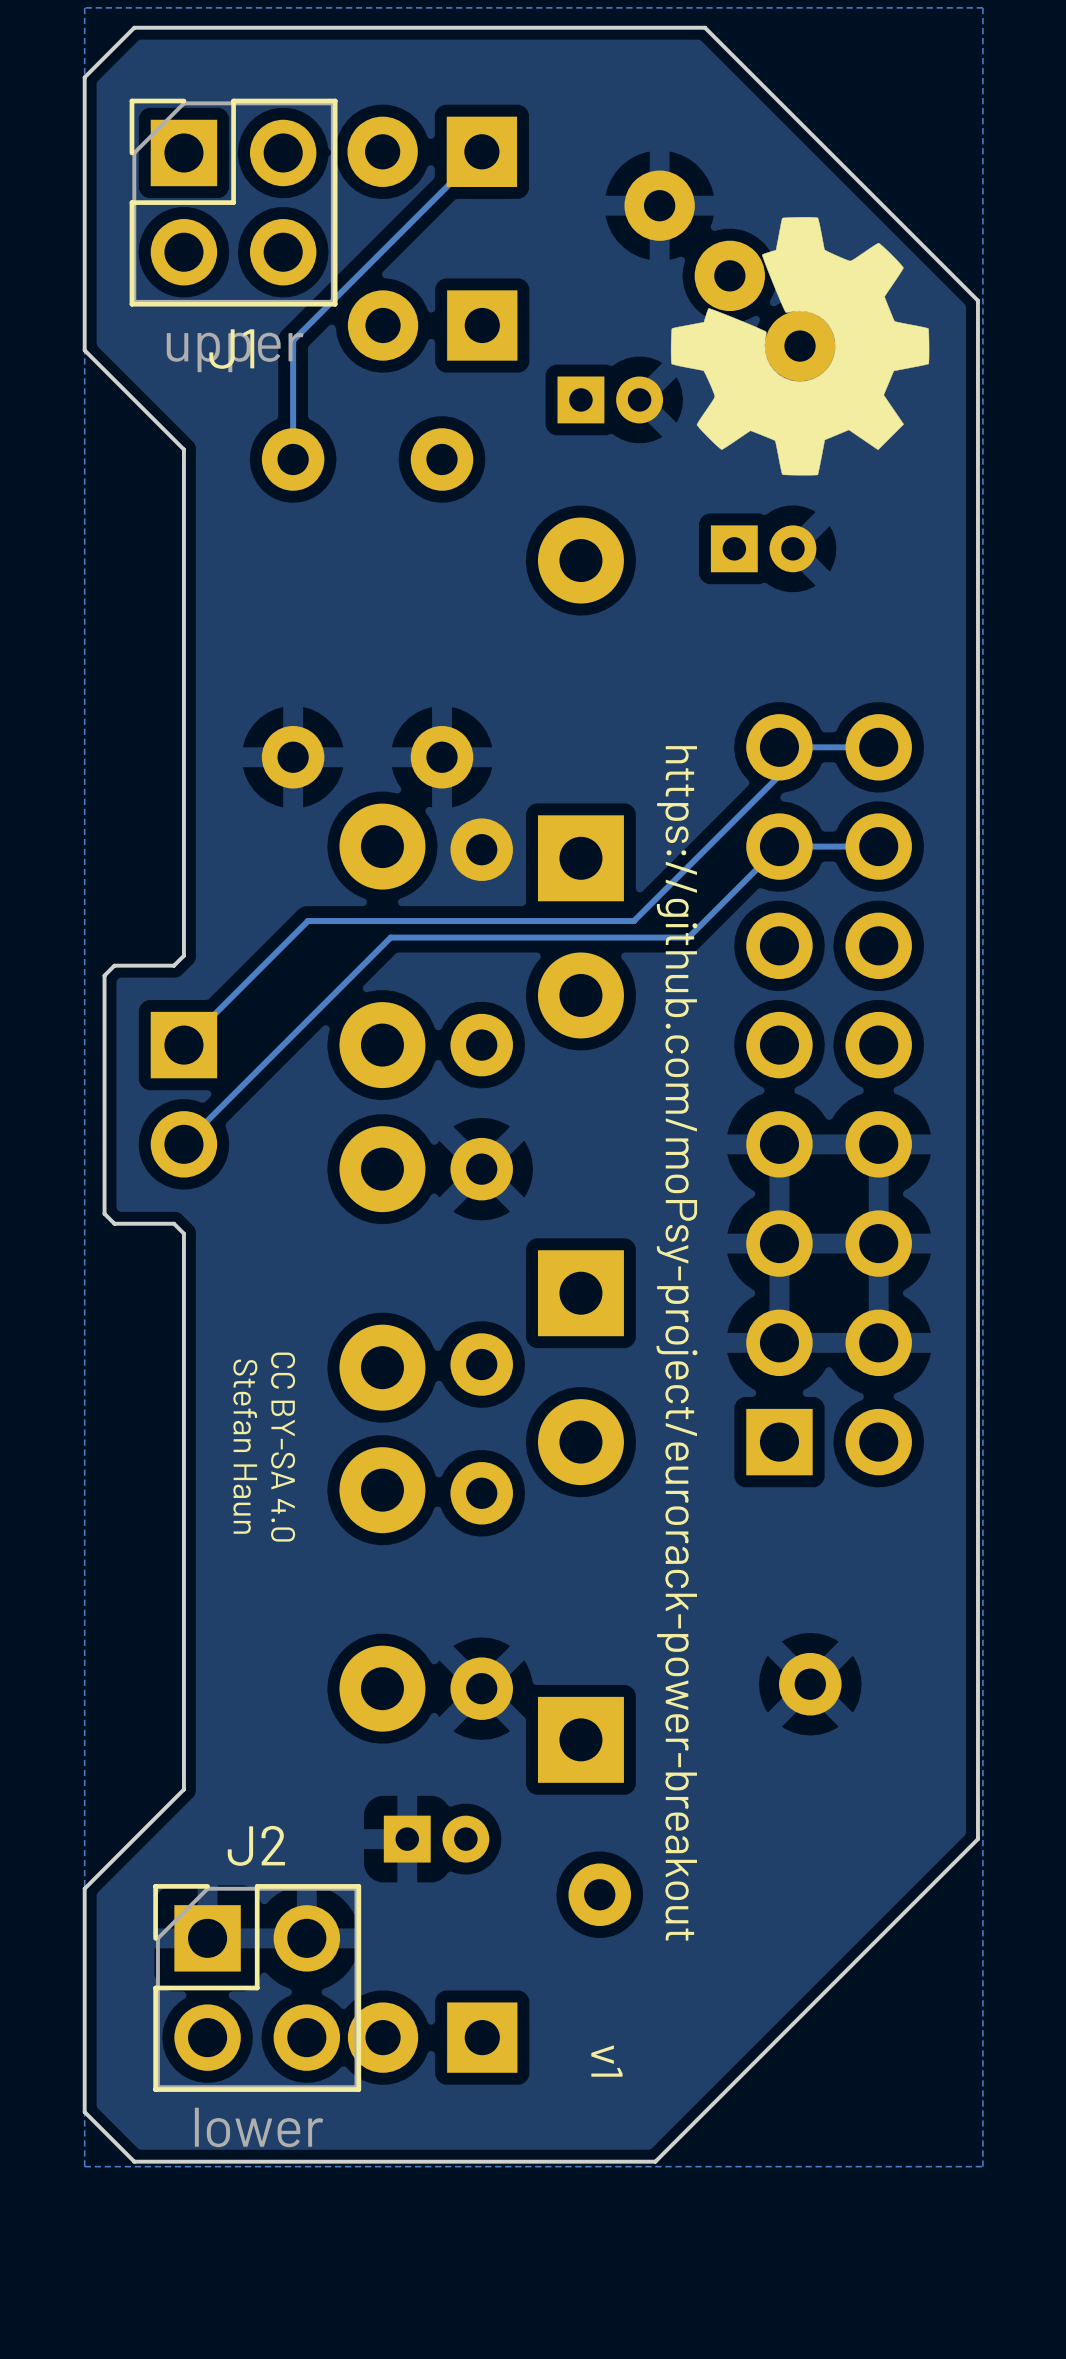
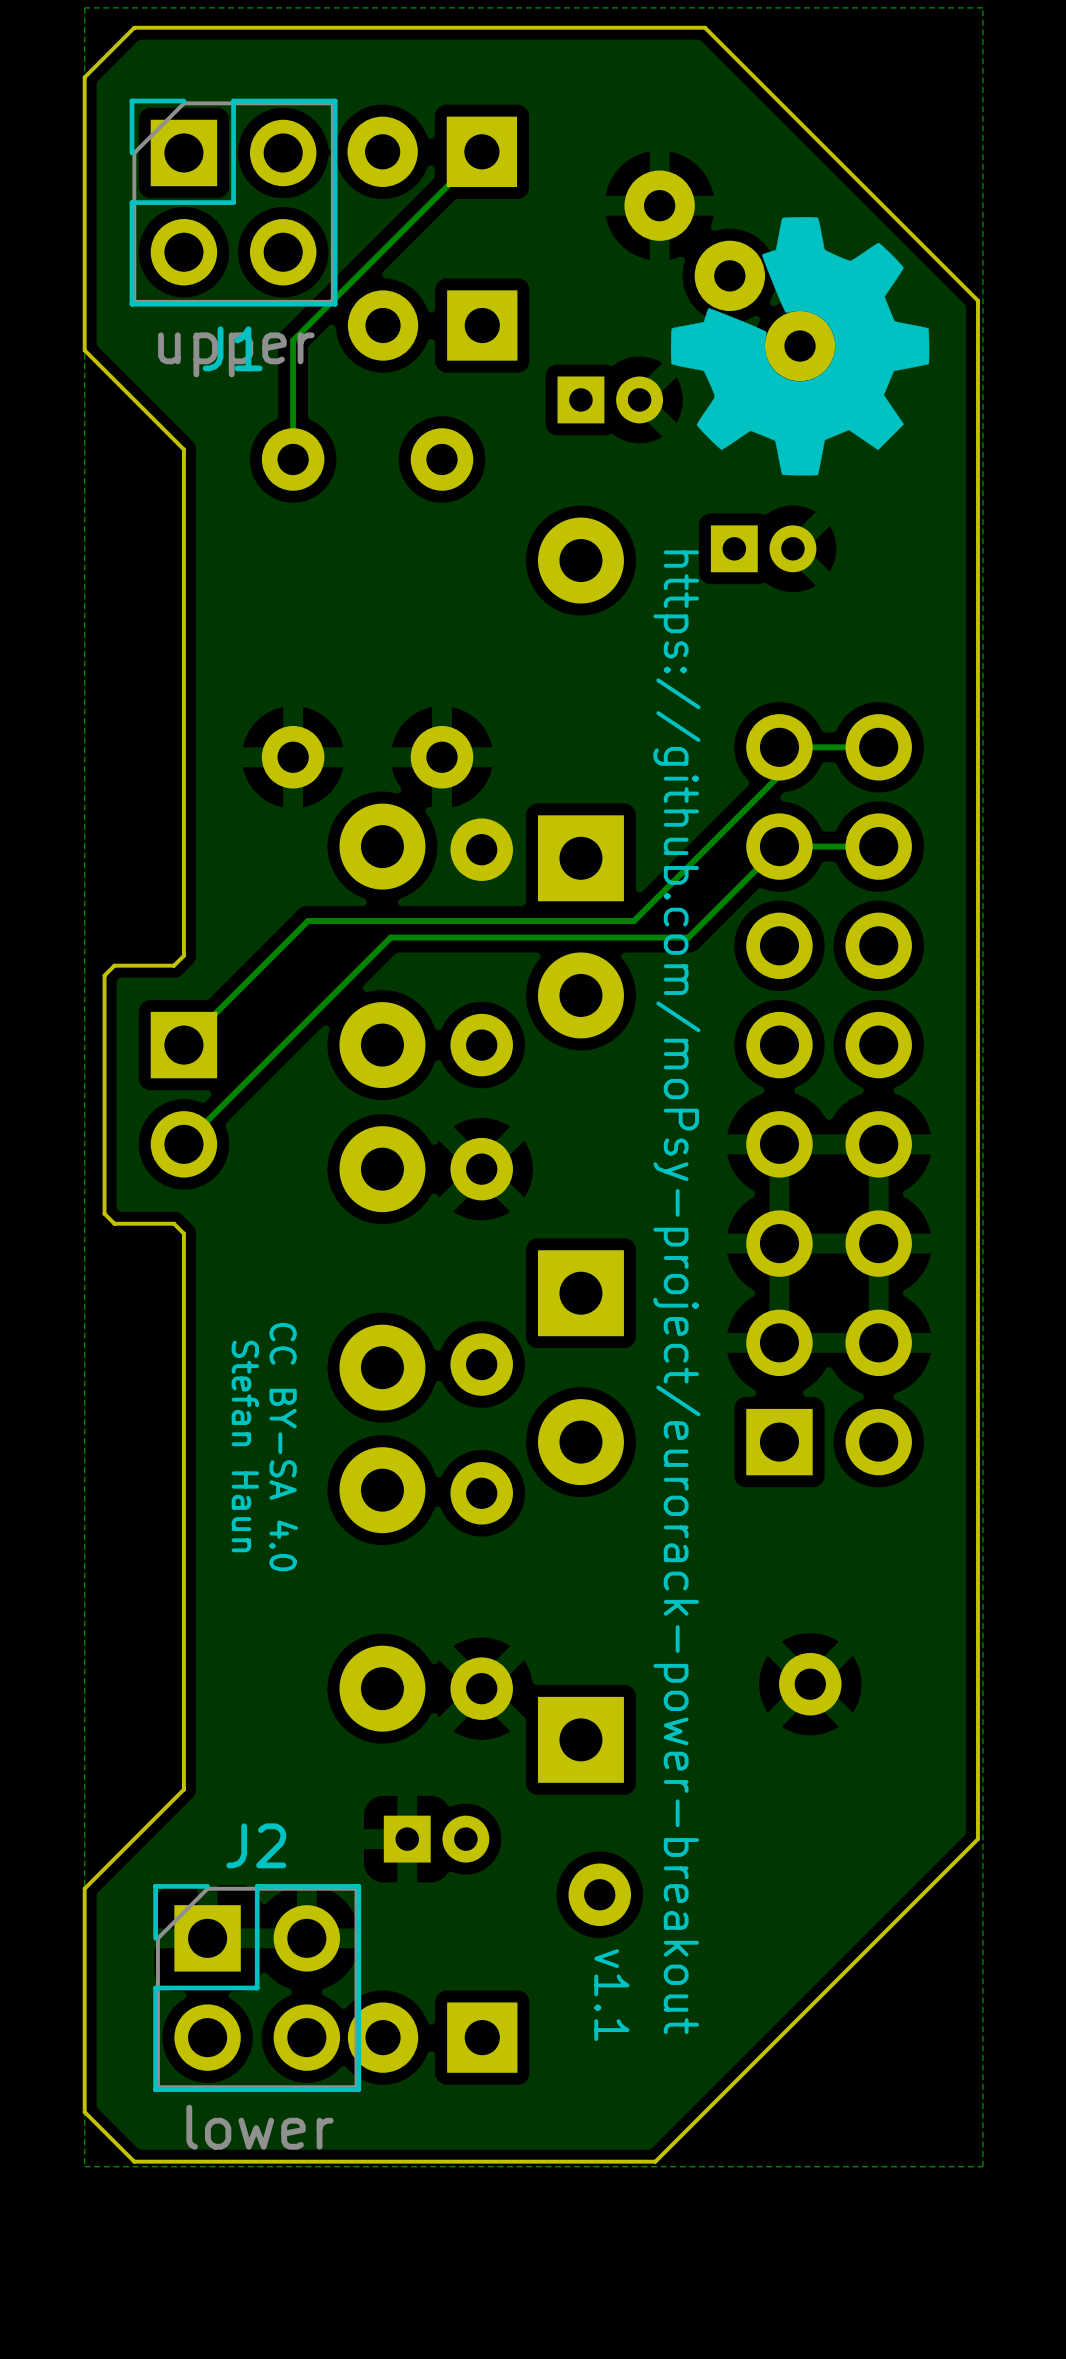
text position: https://github.com/moPsy-project/eurorack-power-breakout (676, 1343) -> https://github.com/moPsy-project/eurorack-power-breakout (676, 1292)
text: v1 (606, 2061) -> v1.1 (611, 1995)

